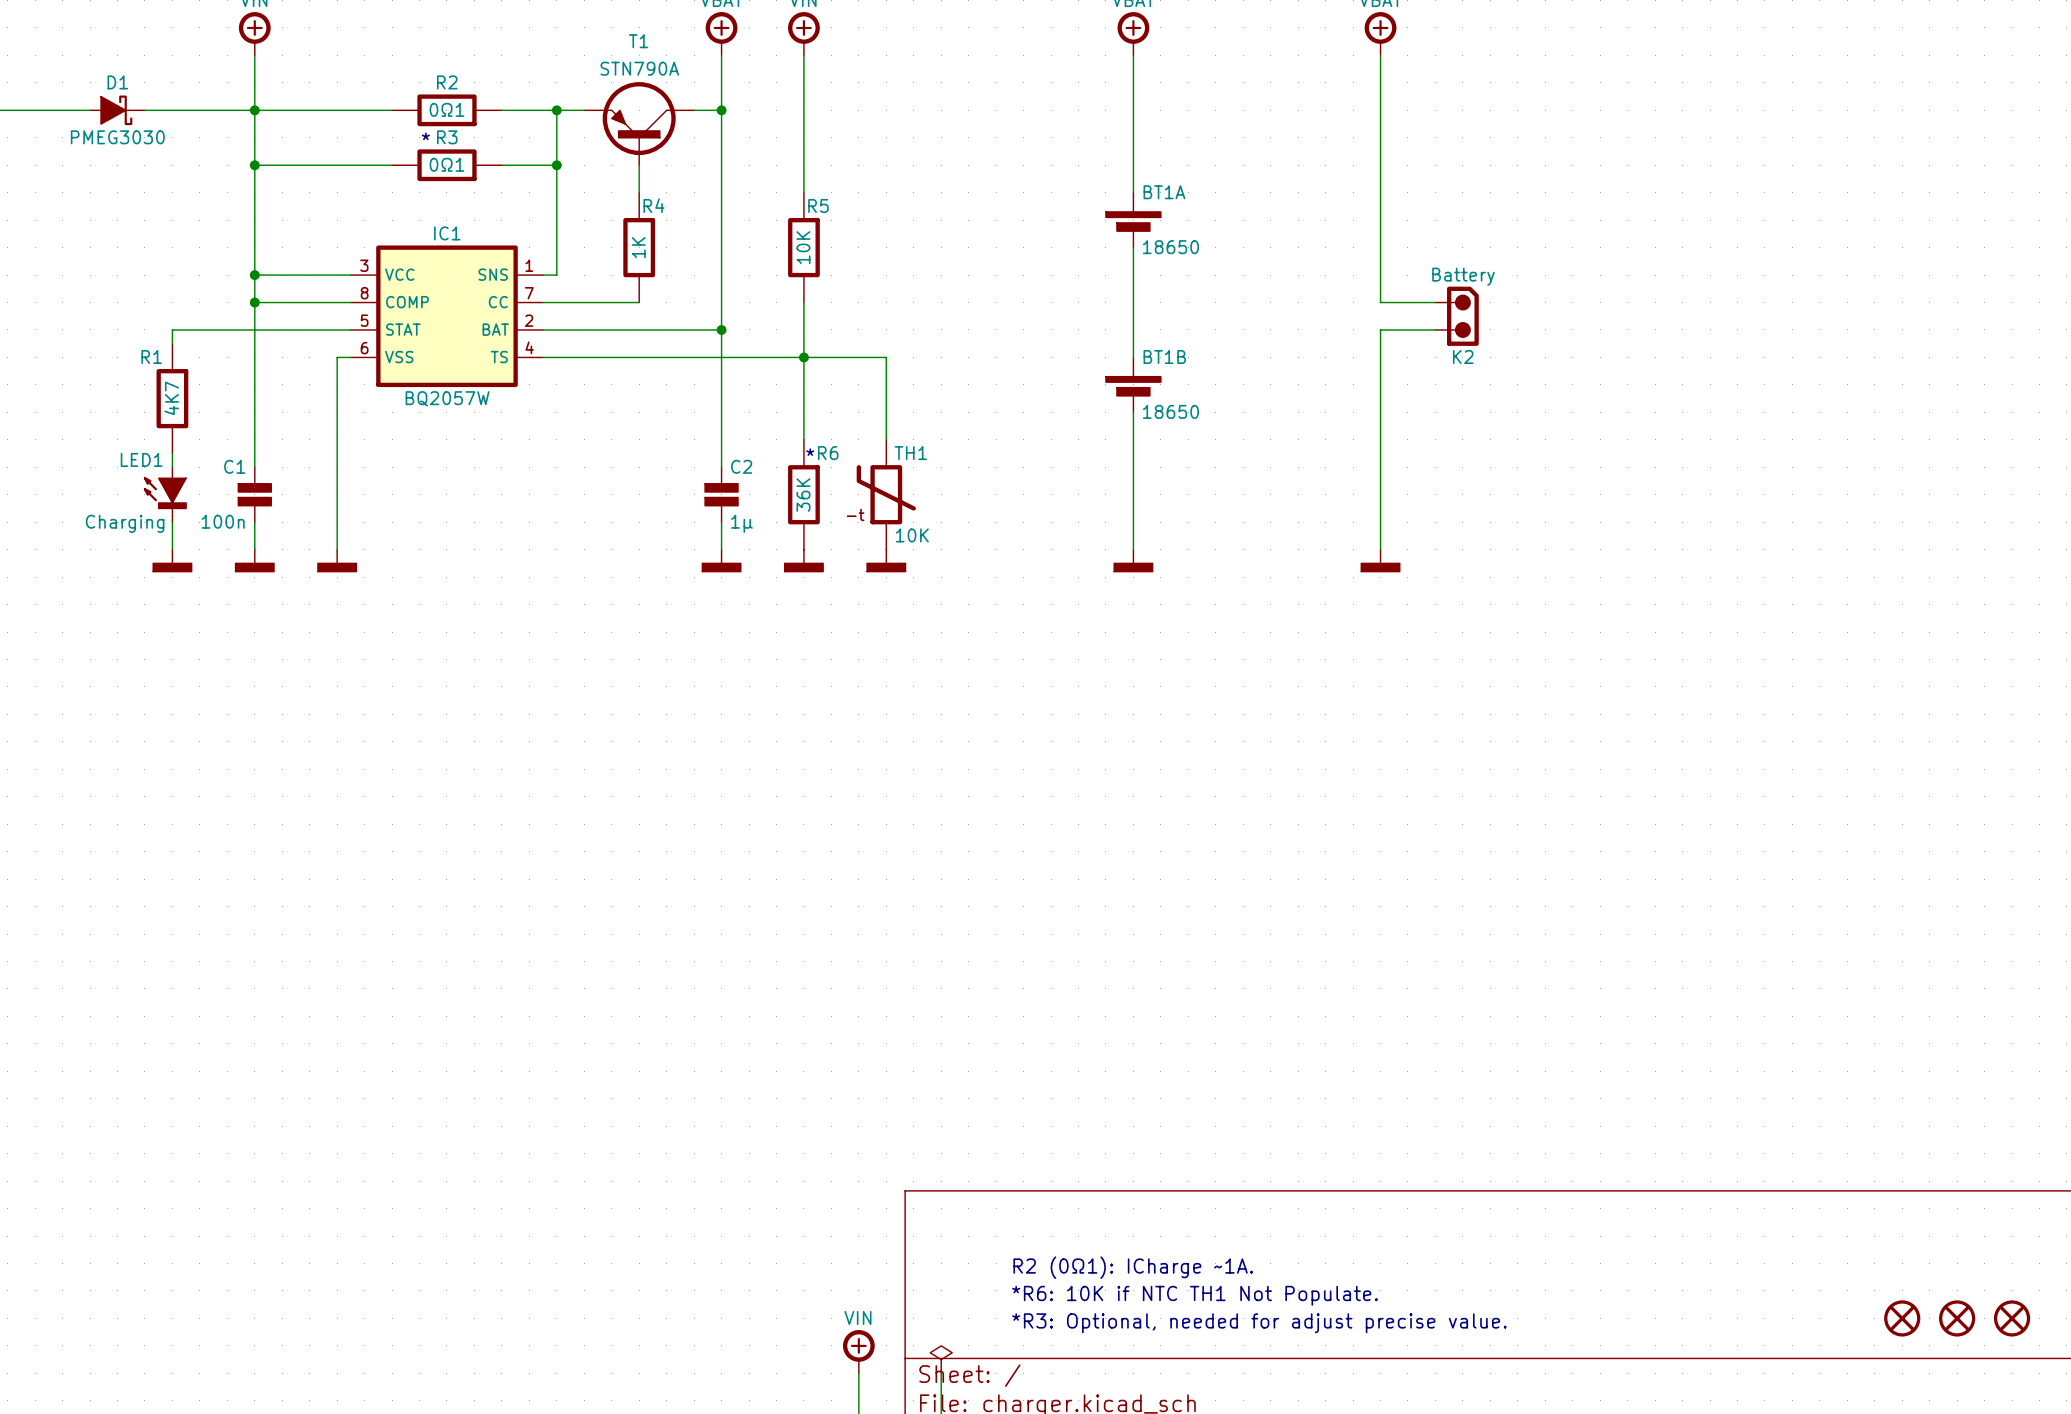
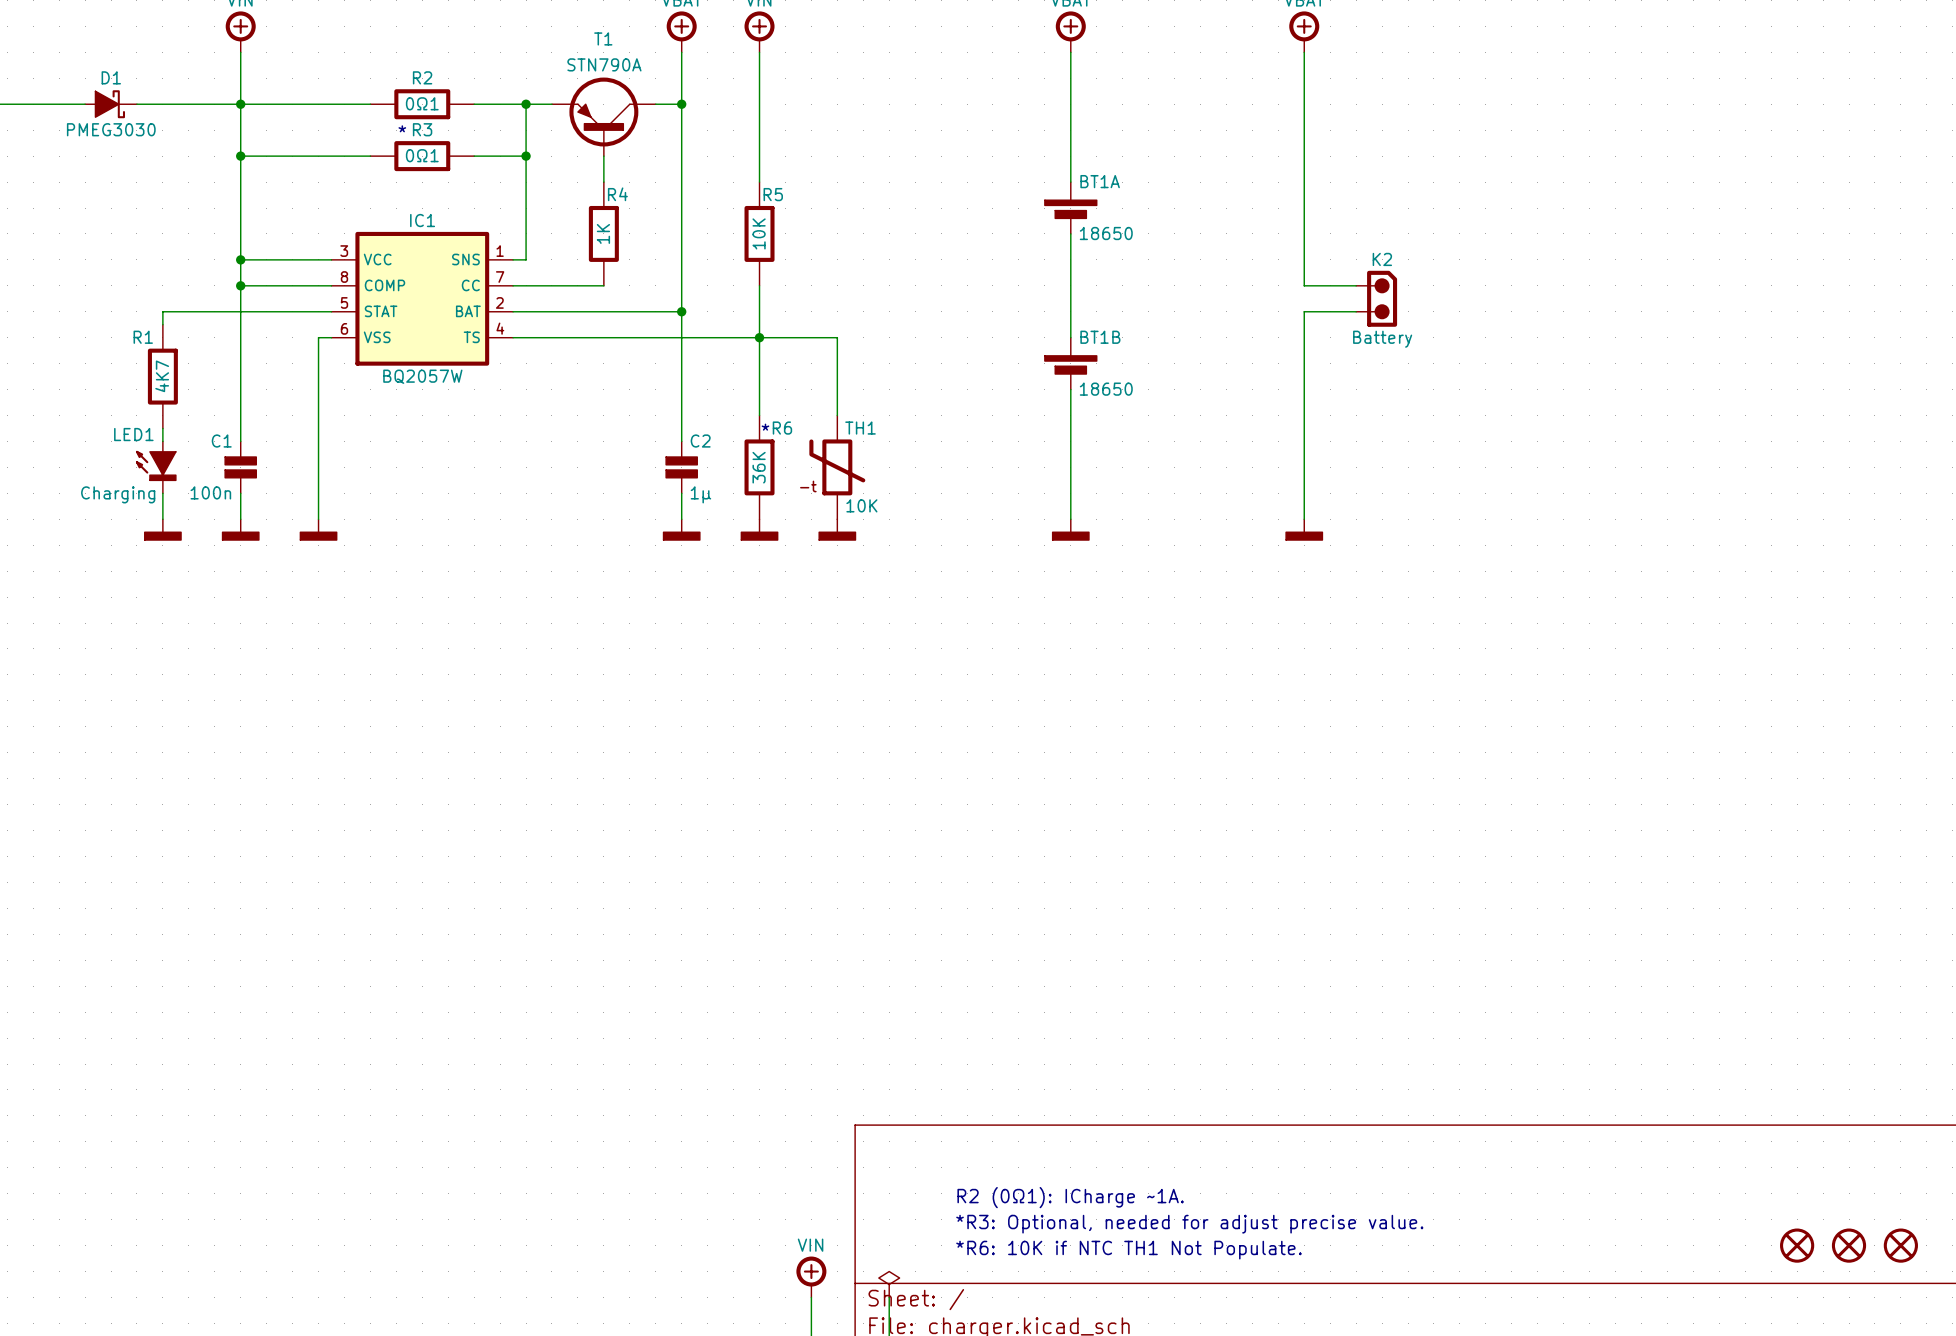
K2 value position: Battery (1463, 276) -> Battery (1382, 339)
K2 name position: K2 (1463, 356) -> K2 (1382, 259)
text: *R6: 10K if NTC TH1 Not Populate. (1194, 1295) -> *R3: Optional, needed for adjust precise value. (1189, 1224)
text: *R3: Optional, needed for adjust precise value. (1259, 1323) -> *R6: 10K if NTC TH1 Not Populate. (1128, 1250)

